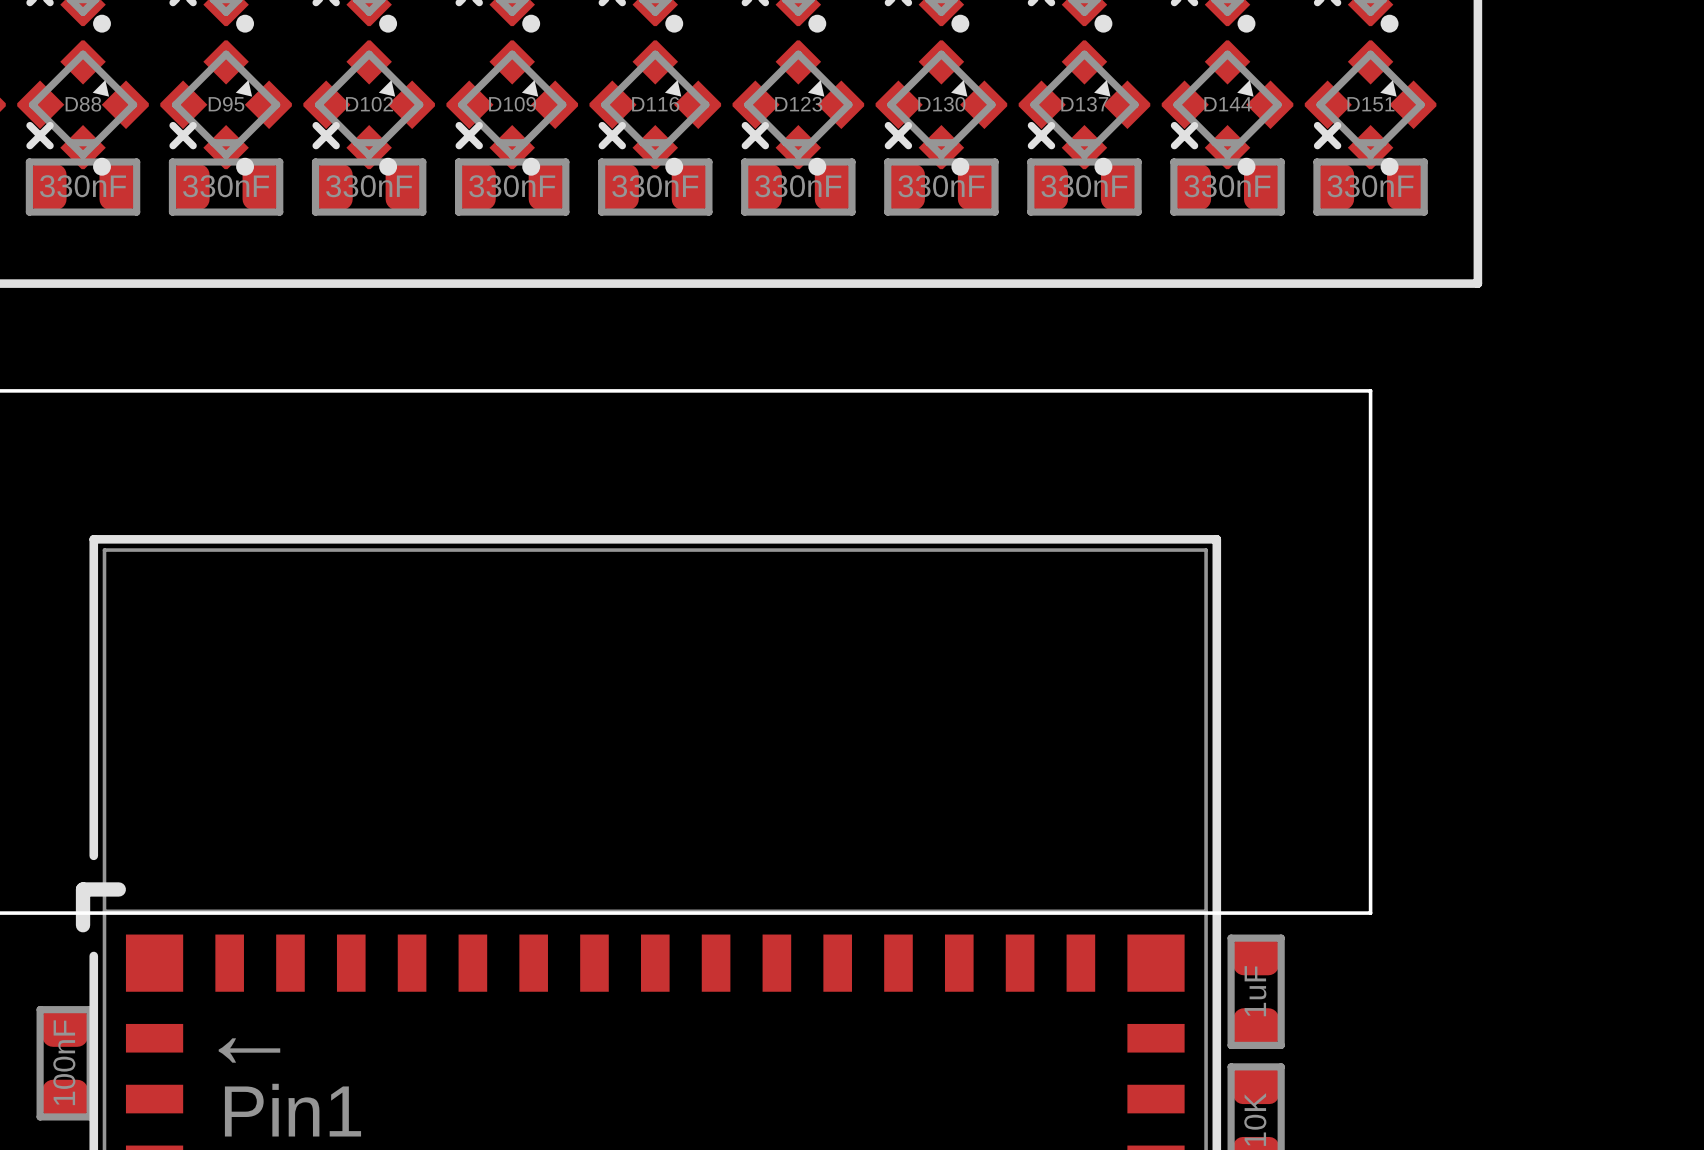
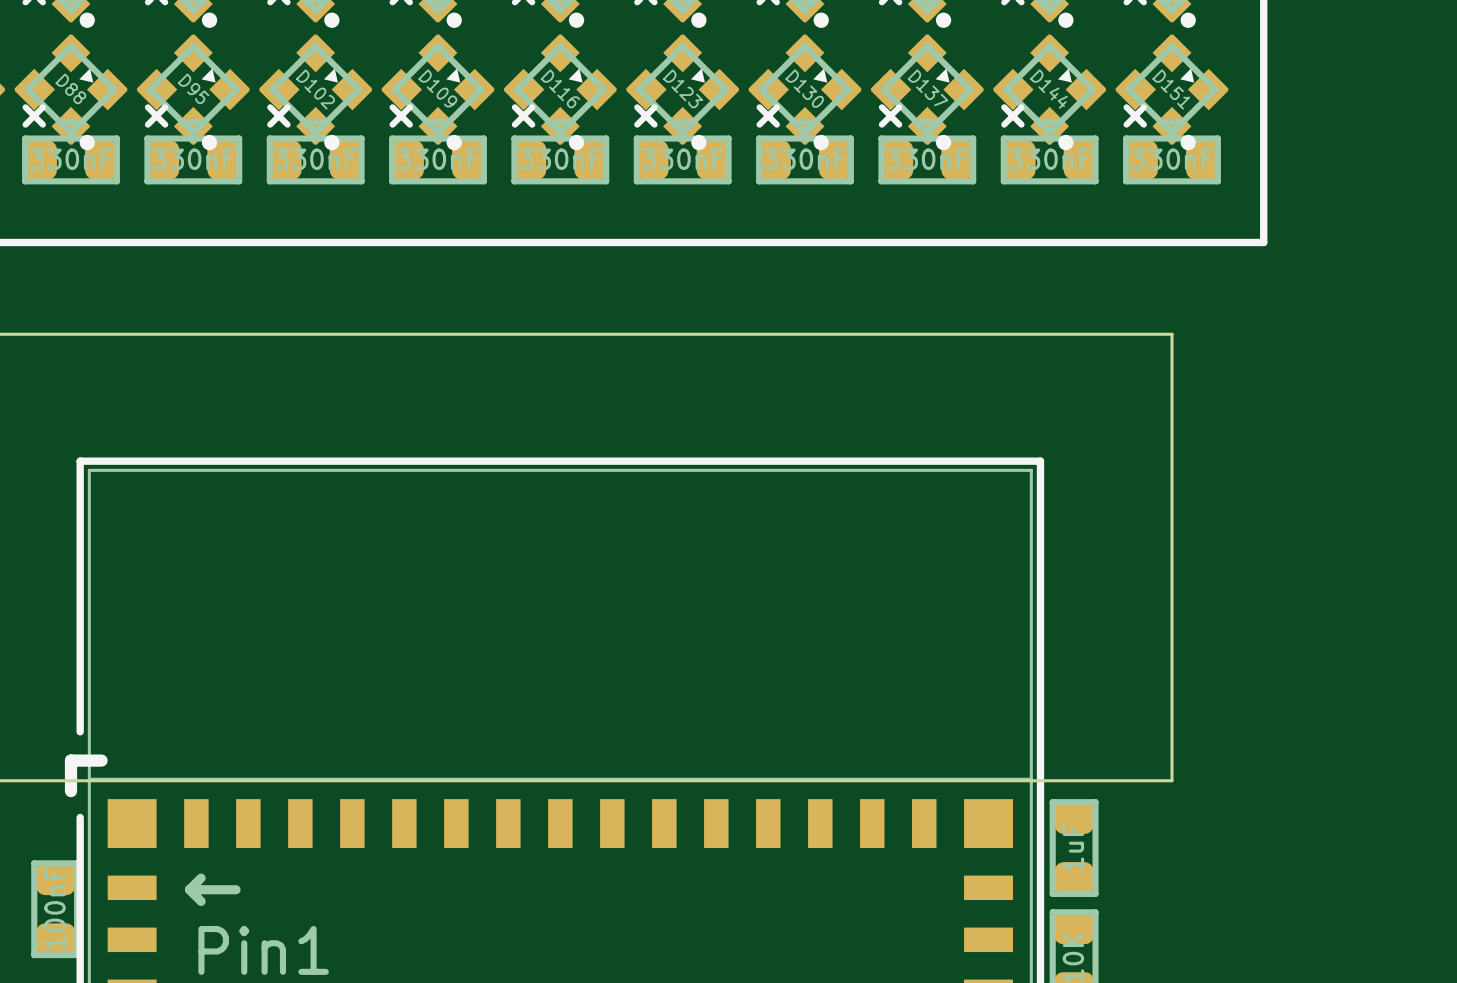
D88 name rotation: 0° (83, 104) -> 45° clockwise (70, 88)
D95 name rotation: 0° (226, 104) -> 45° clockwise (193, 88)
D102 name rotation: 0° (369, 104) -> 45° clockwise (315, 89)
D109 name rotation: 0° (512, 104) -> 45° clockwise (437, 88)
D116 name rotation: 0° (655, 104) -> 45° clockwise (560, 88)
D123 name rotation: 0° (798, 104) -> 45° clockwise (683, 88)
D130 name rotation: 0° (941, 104) -> 45° clockwise (804, 88)
D137 name rotation: 0° (1084, 104) -> 45° clockwise (928, 87)
D144 name rotation: 0° (1228, 104) -> 45° clockwise (1048, 89)
D151 name rotation: 0° (1370, 104) -> 45° clockwise (1171, 89)

